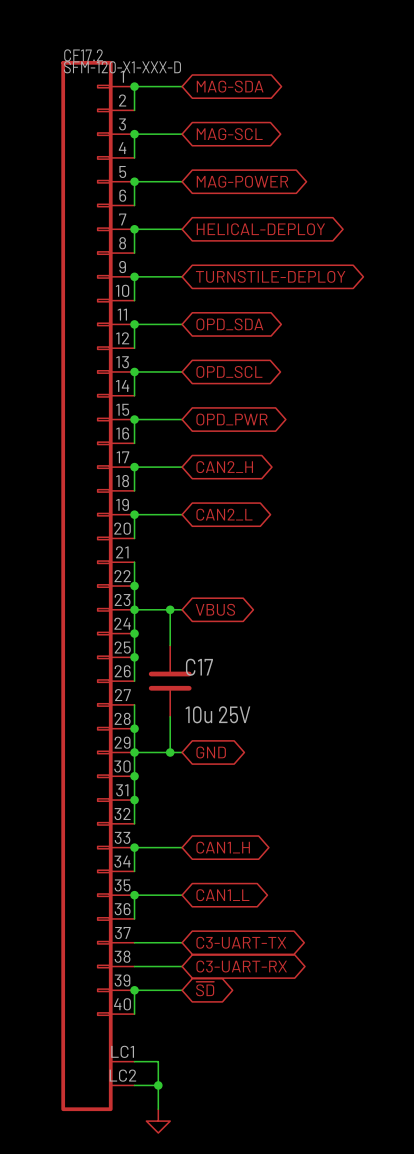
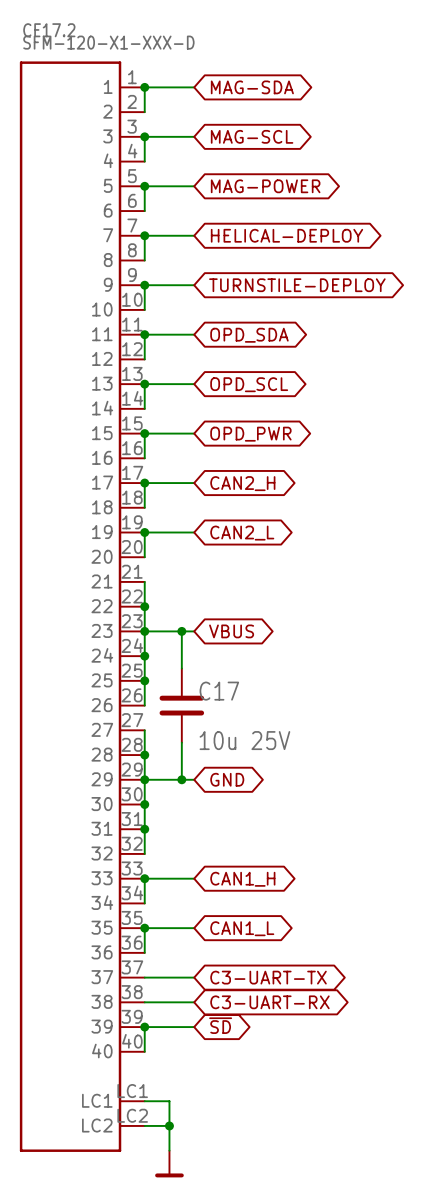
CF17.2 name position: CF17.2 (83, 55) -> CF17.2 (49, 30)
CF17.2 symbol: [61, 60, 135, 1112] -> [19, 61, 145, 1152]
CF17.2 value position: SFM-120-X1-XXX-D (122, 67) -> SFM-120-X1-XXX-D (108, 42)
power symbol shape: [146, 1109, 171, 1134] -> [155, 1150, 184, 1178]

